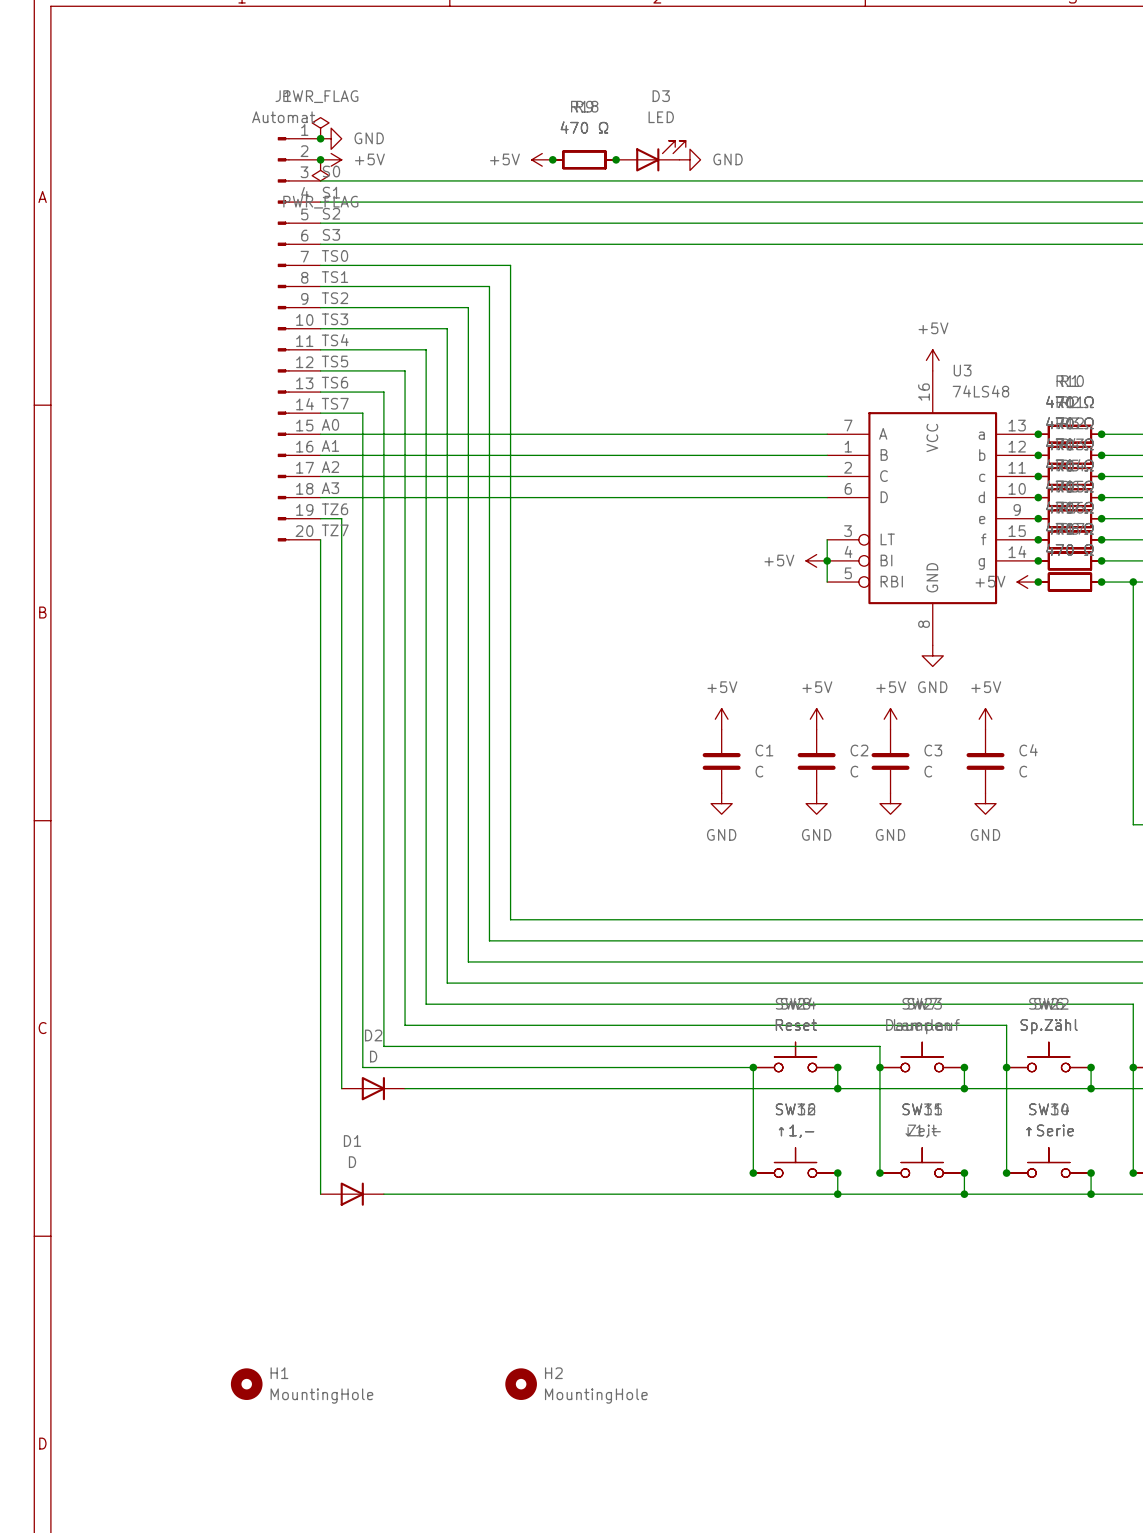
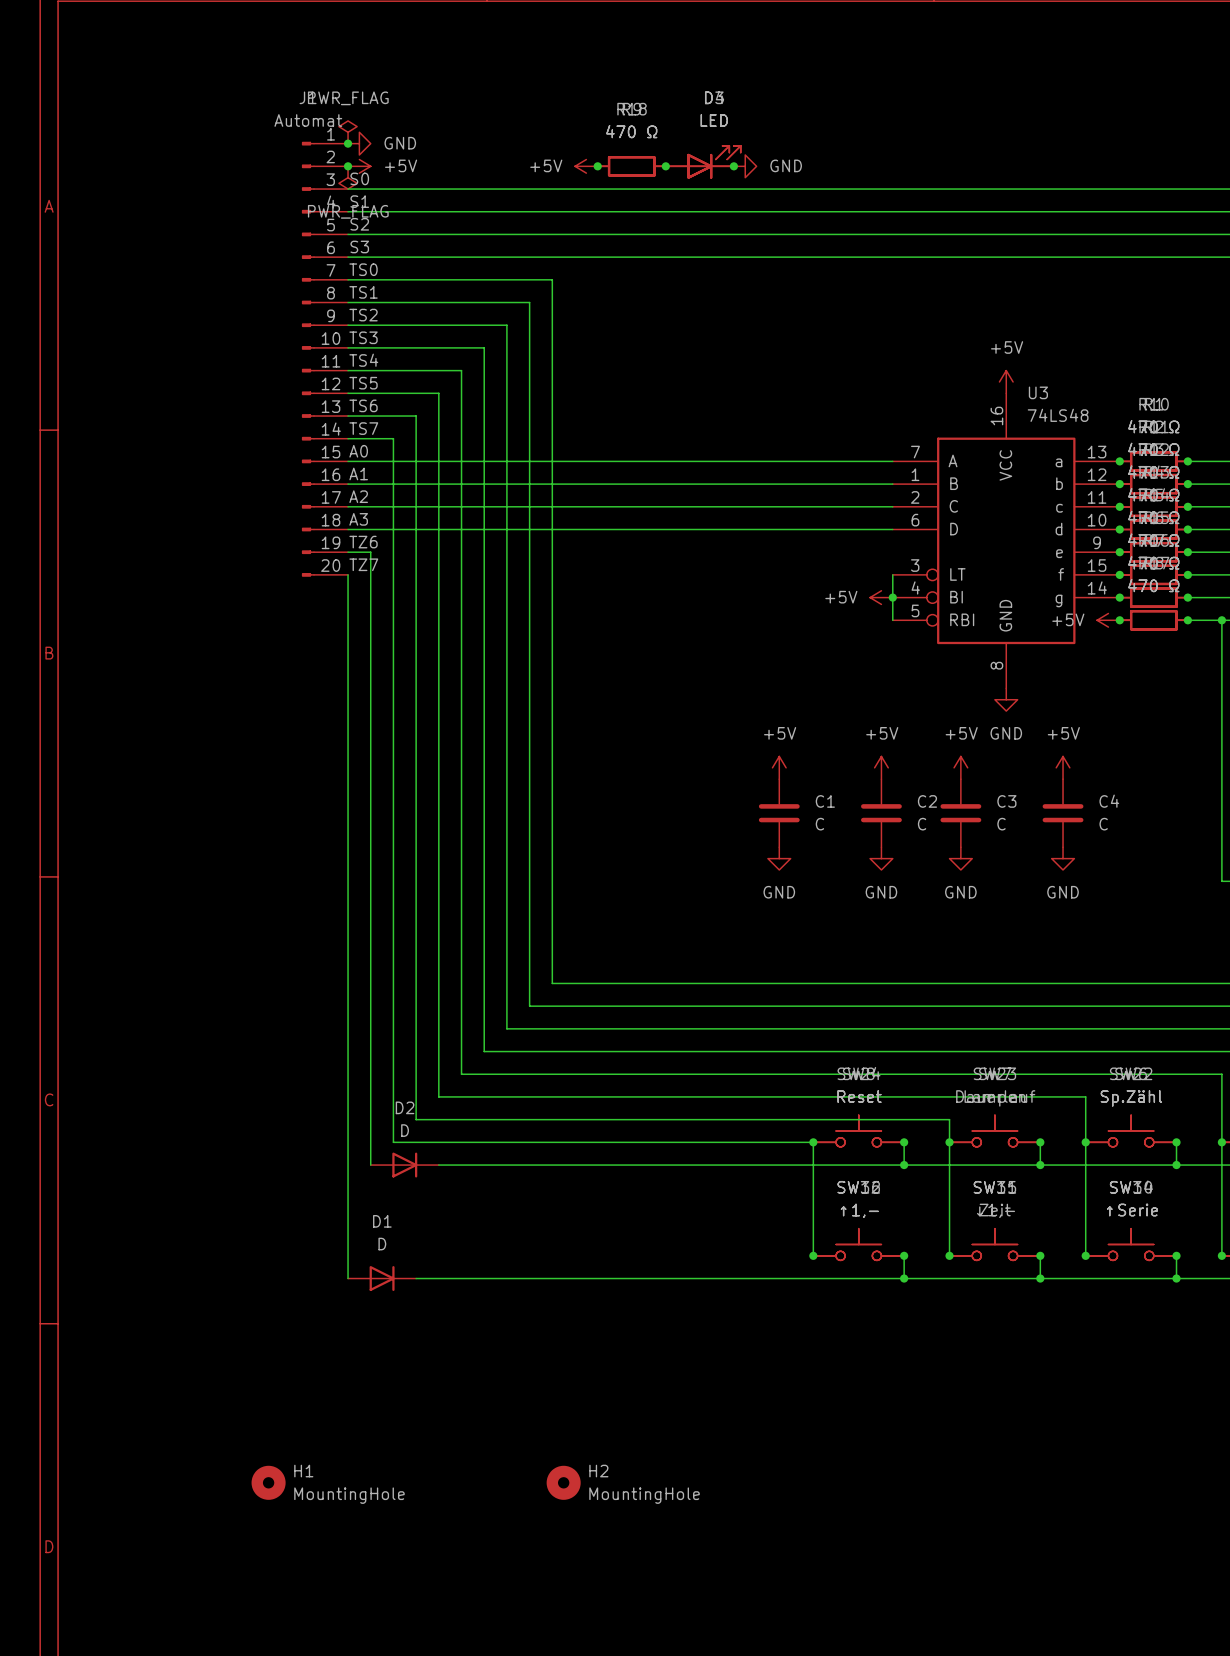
part: none -> LED (703, 162)
junction: none -> (733, 166)

